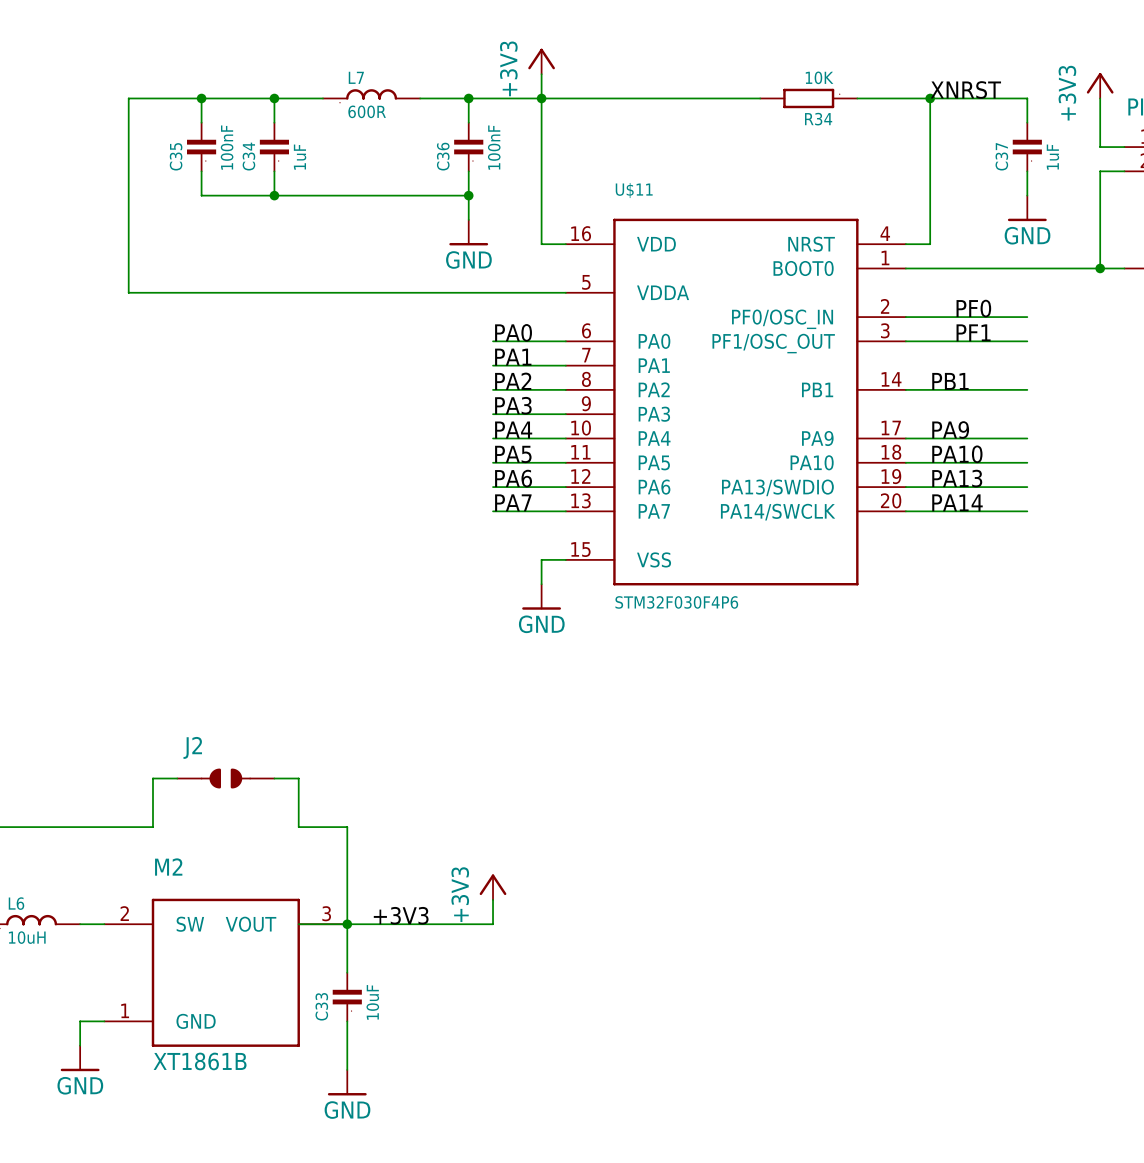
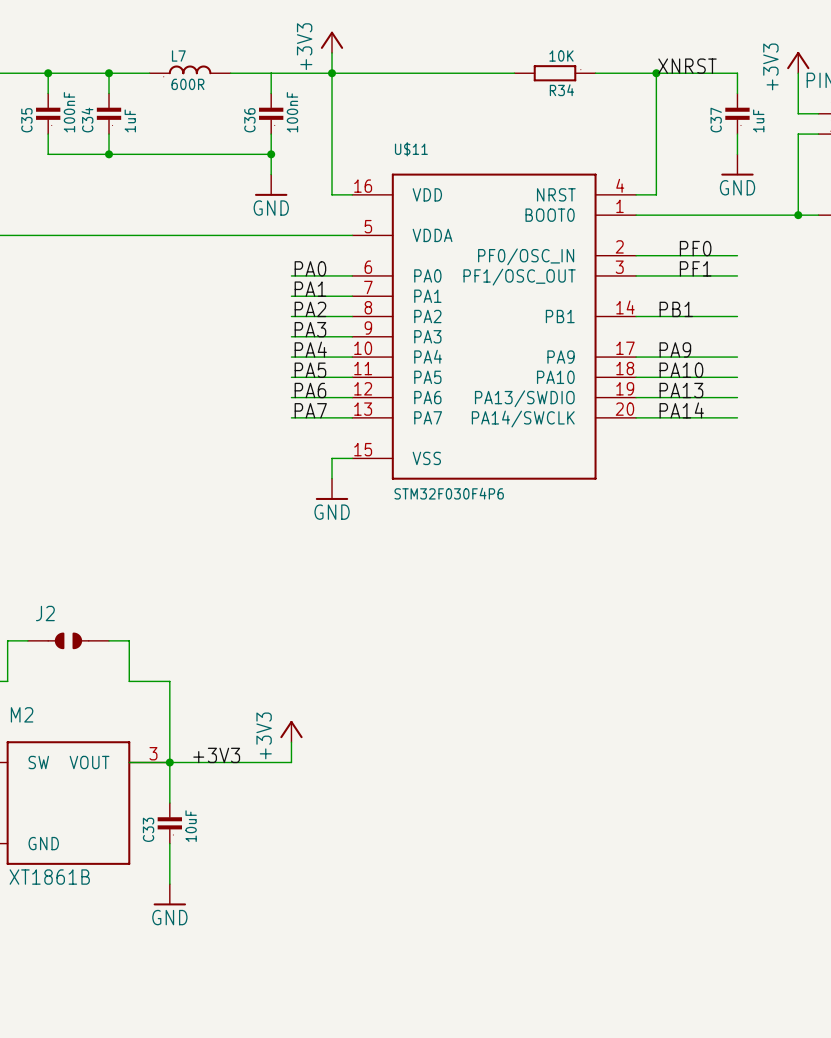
junction: (468, 98) -> none

